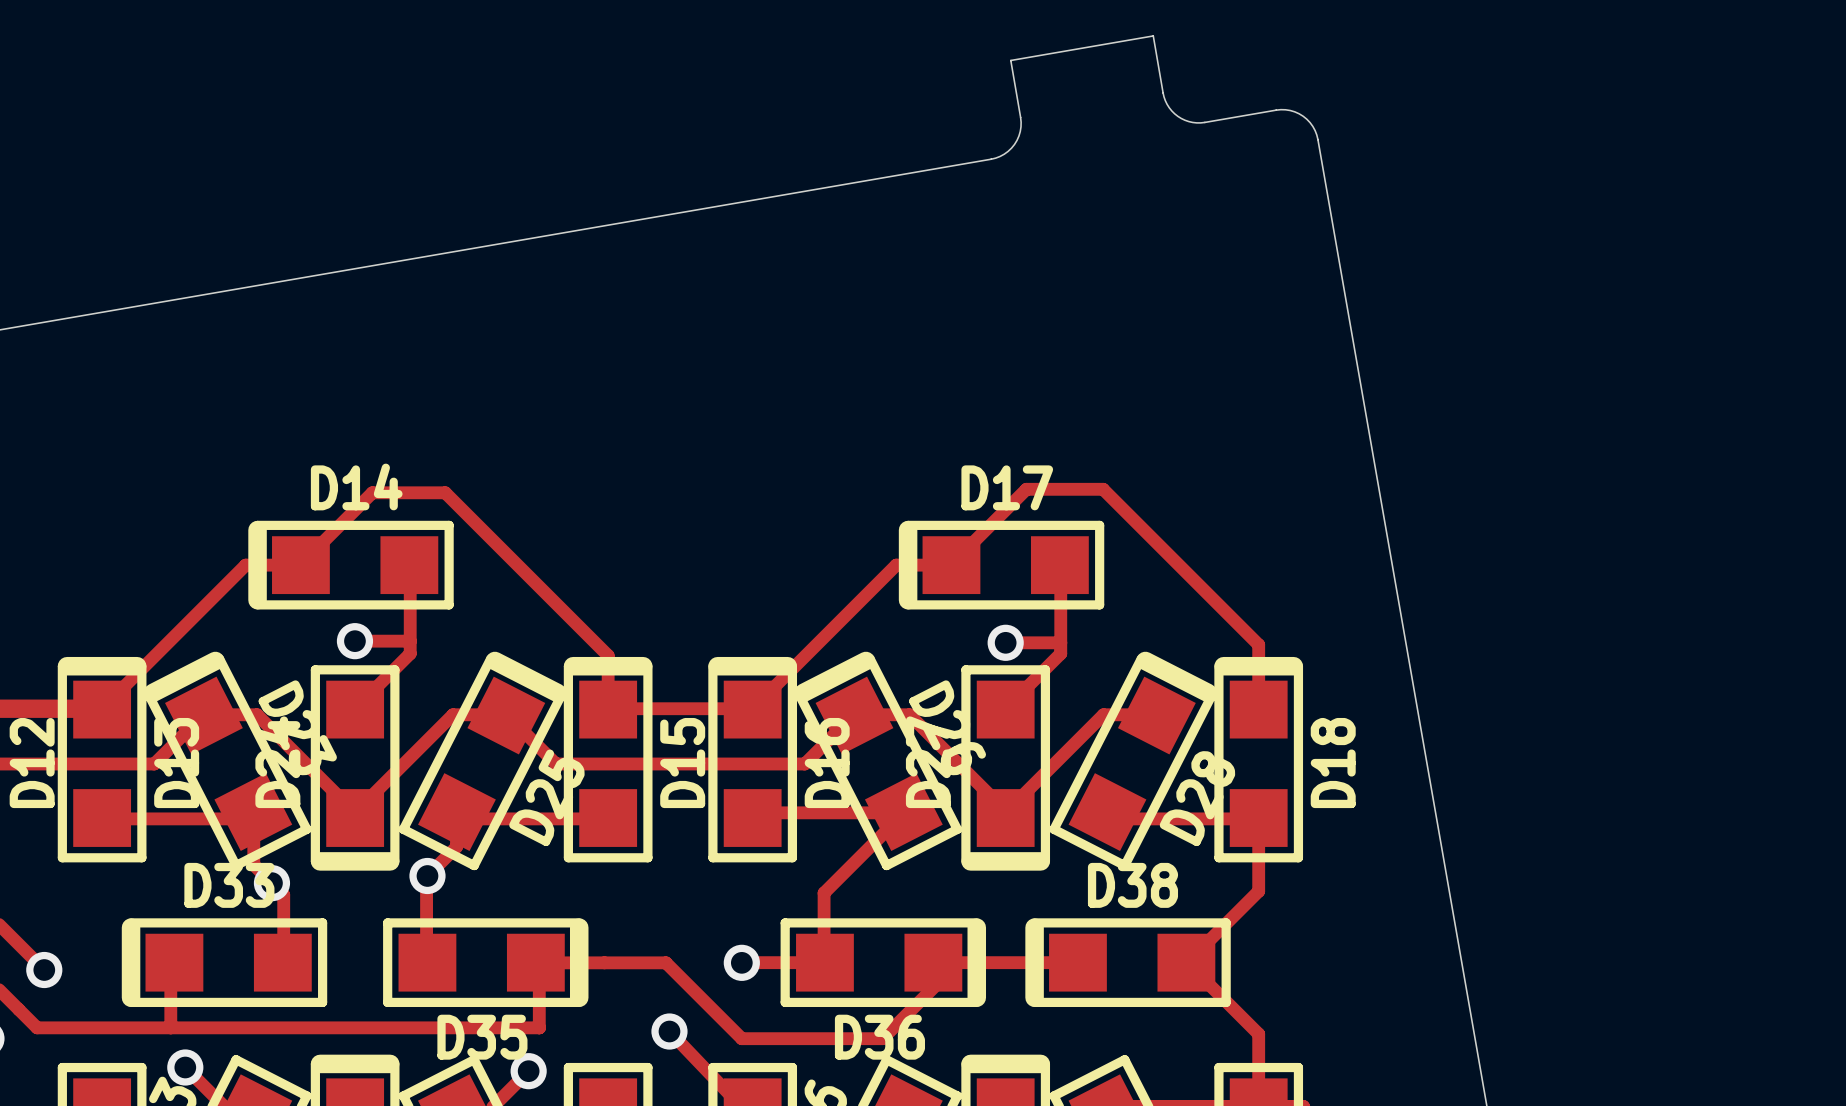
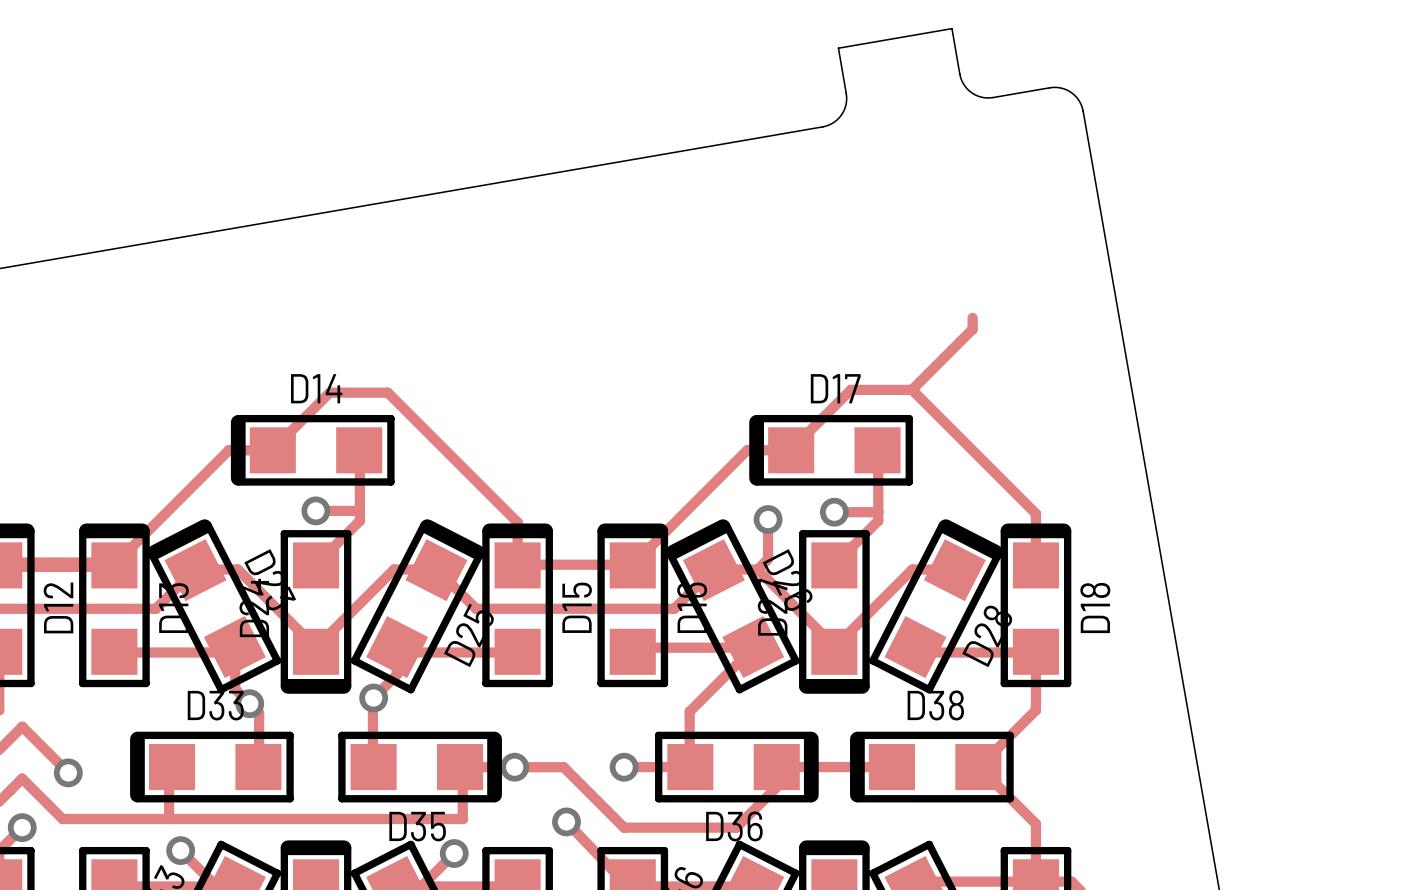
track: none -> (972, 317) (972, 329) (912, 389)
track: none -> (768, 519) (768, 559) (757, 569)
via: none -> (768, 519)
via: none -> (514, 767)

